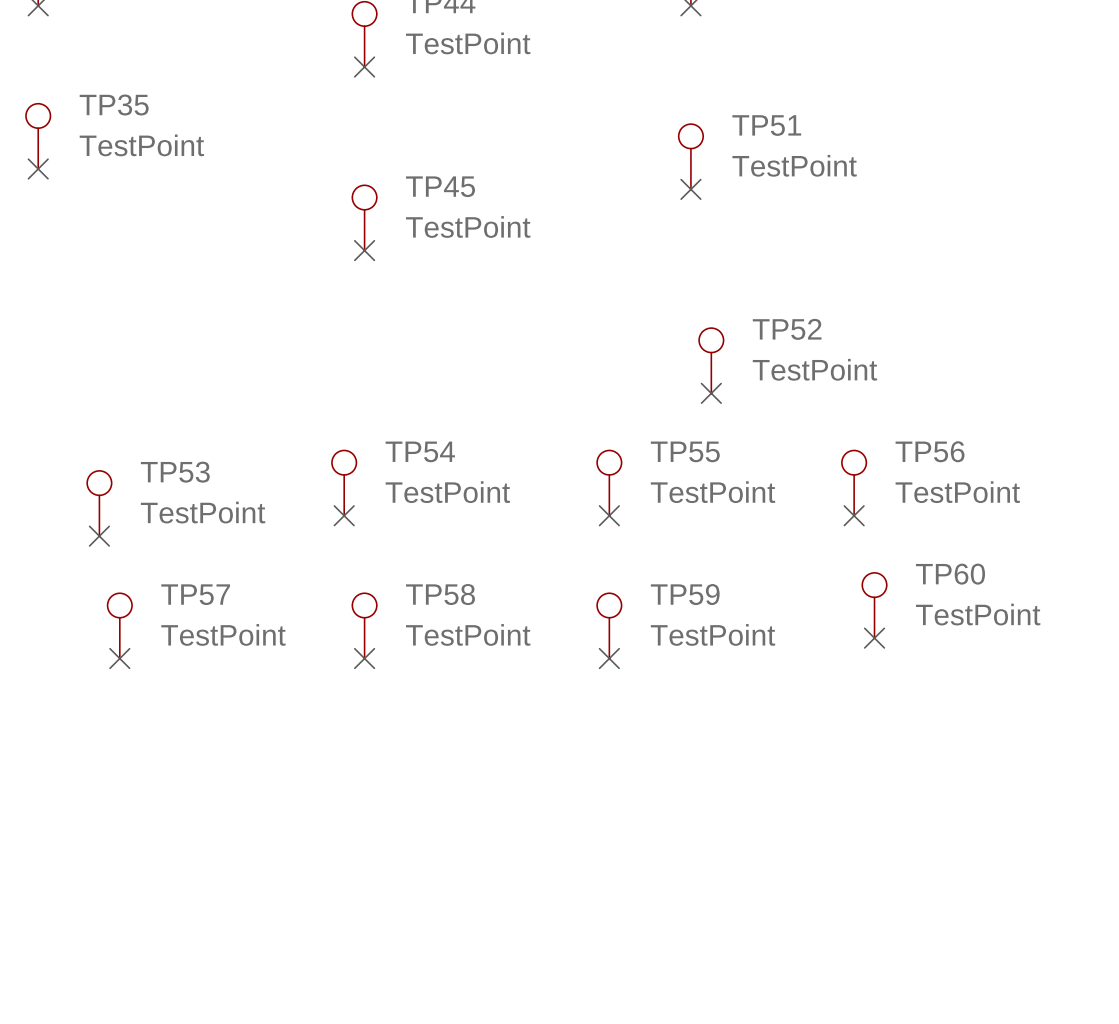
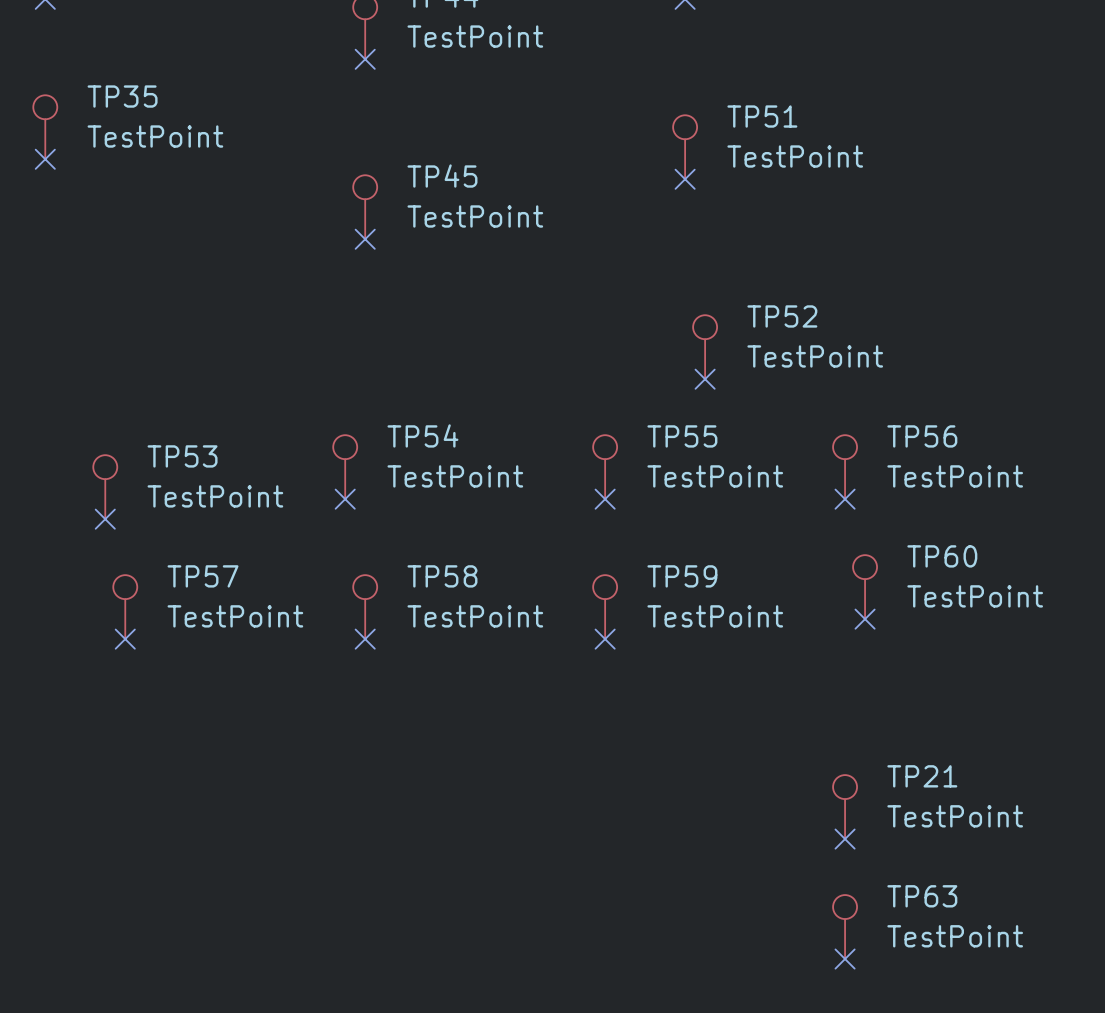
TP21: none -> TestPoint (845, 807)
no-connect mark: none -> (845, 839)
TP63: none -> TestPoint (845, 927)
no-connect mark: none -> (845, 959)

